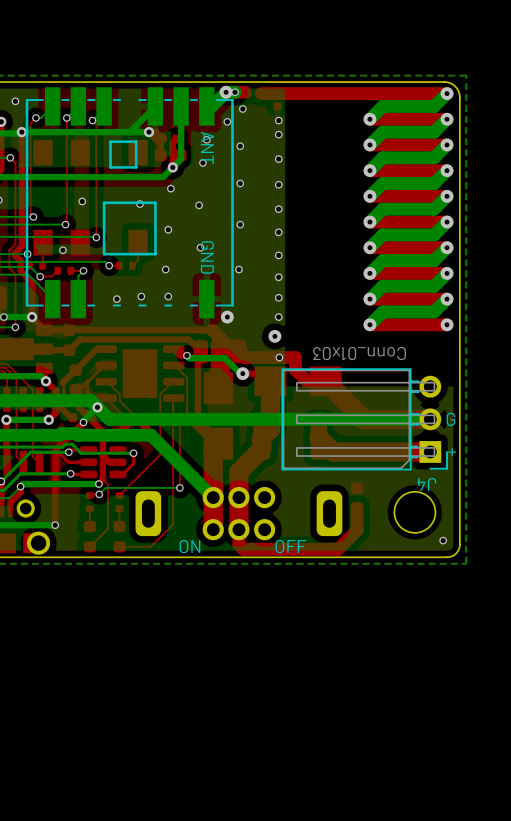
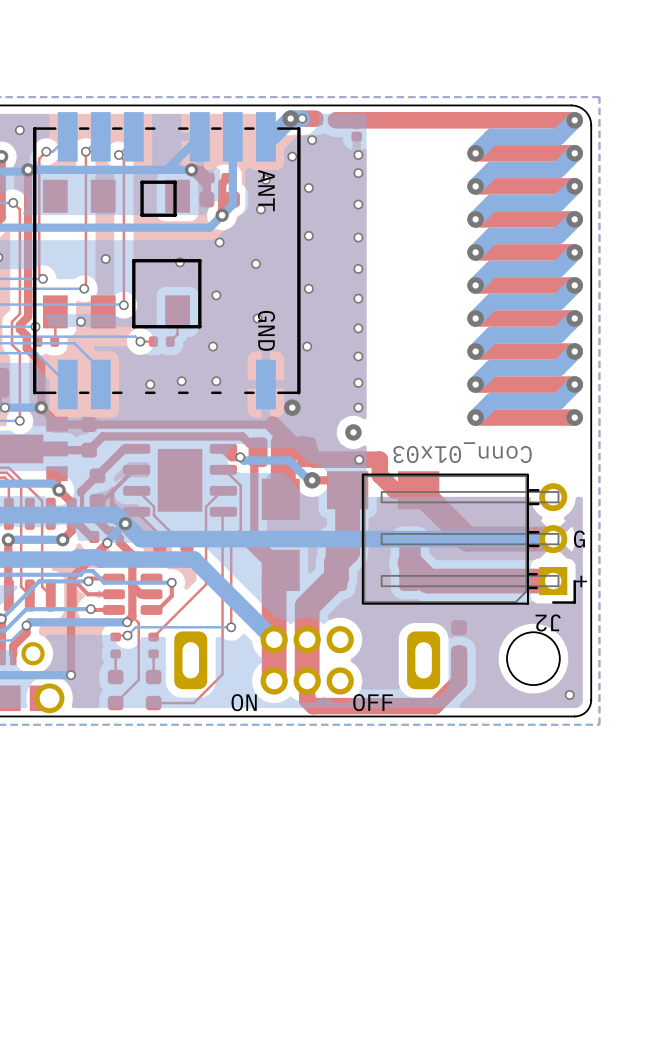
bottom track: (30, 266) (40, 276) -> (39, 343) (74, 343) (100, 369)
top track: (57, 270) (51, 276) (40, 276) -> none
part: (64, 270) -> none
top track: (83, 270) (70, 270) -> none
bottom track: (83, 270) (78, 275) (78, 287) -> none
via: (83, 270) -> none
via: (40, 276) -> none
J4 name: J4 (426, 484) -> J2 (548, 622)

